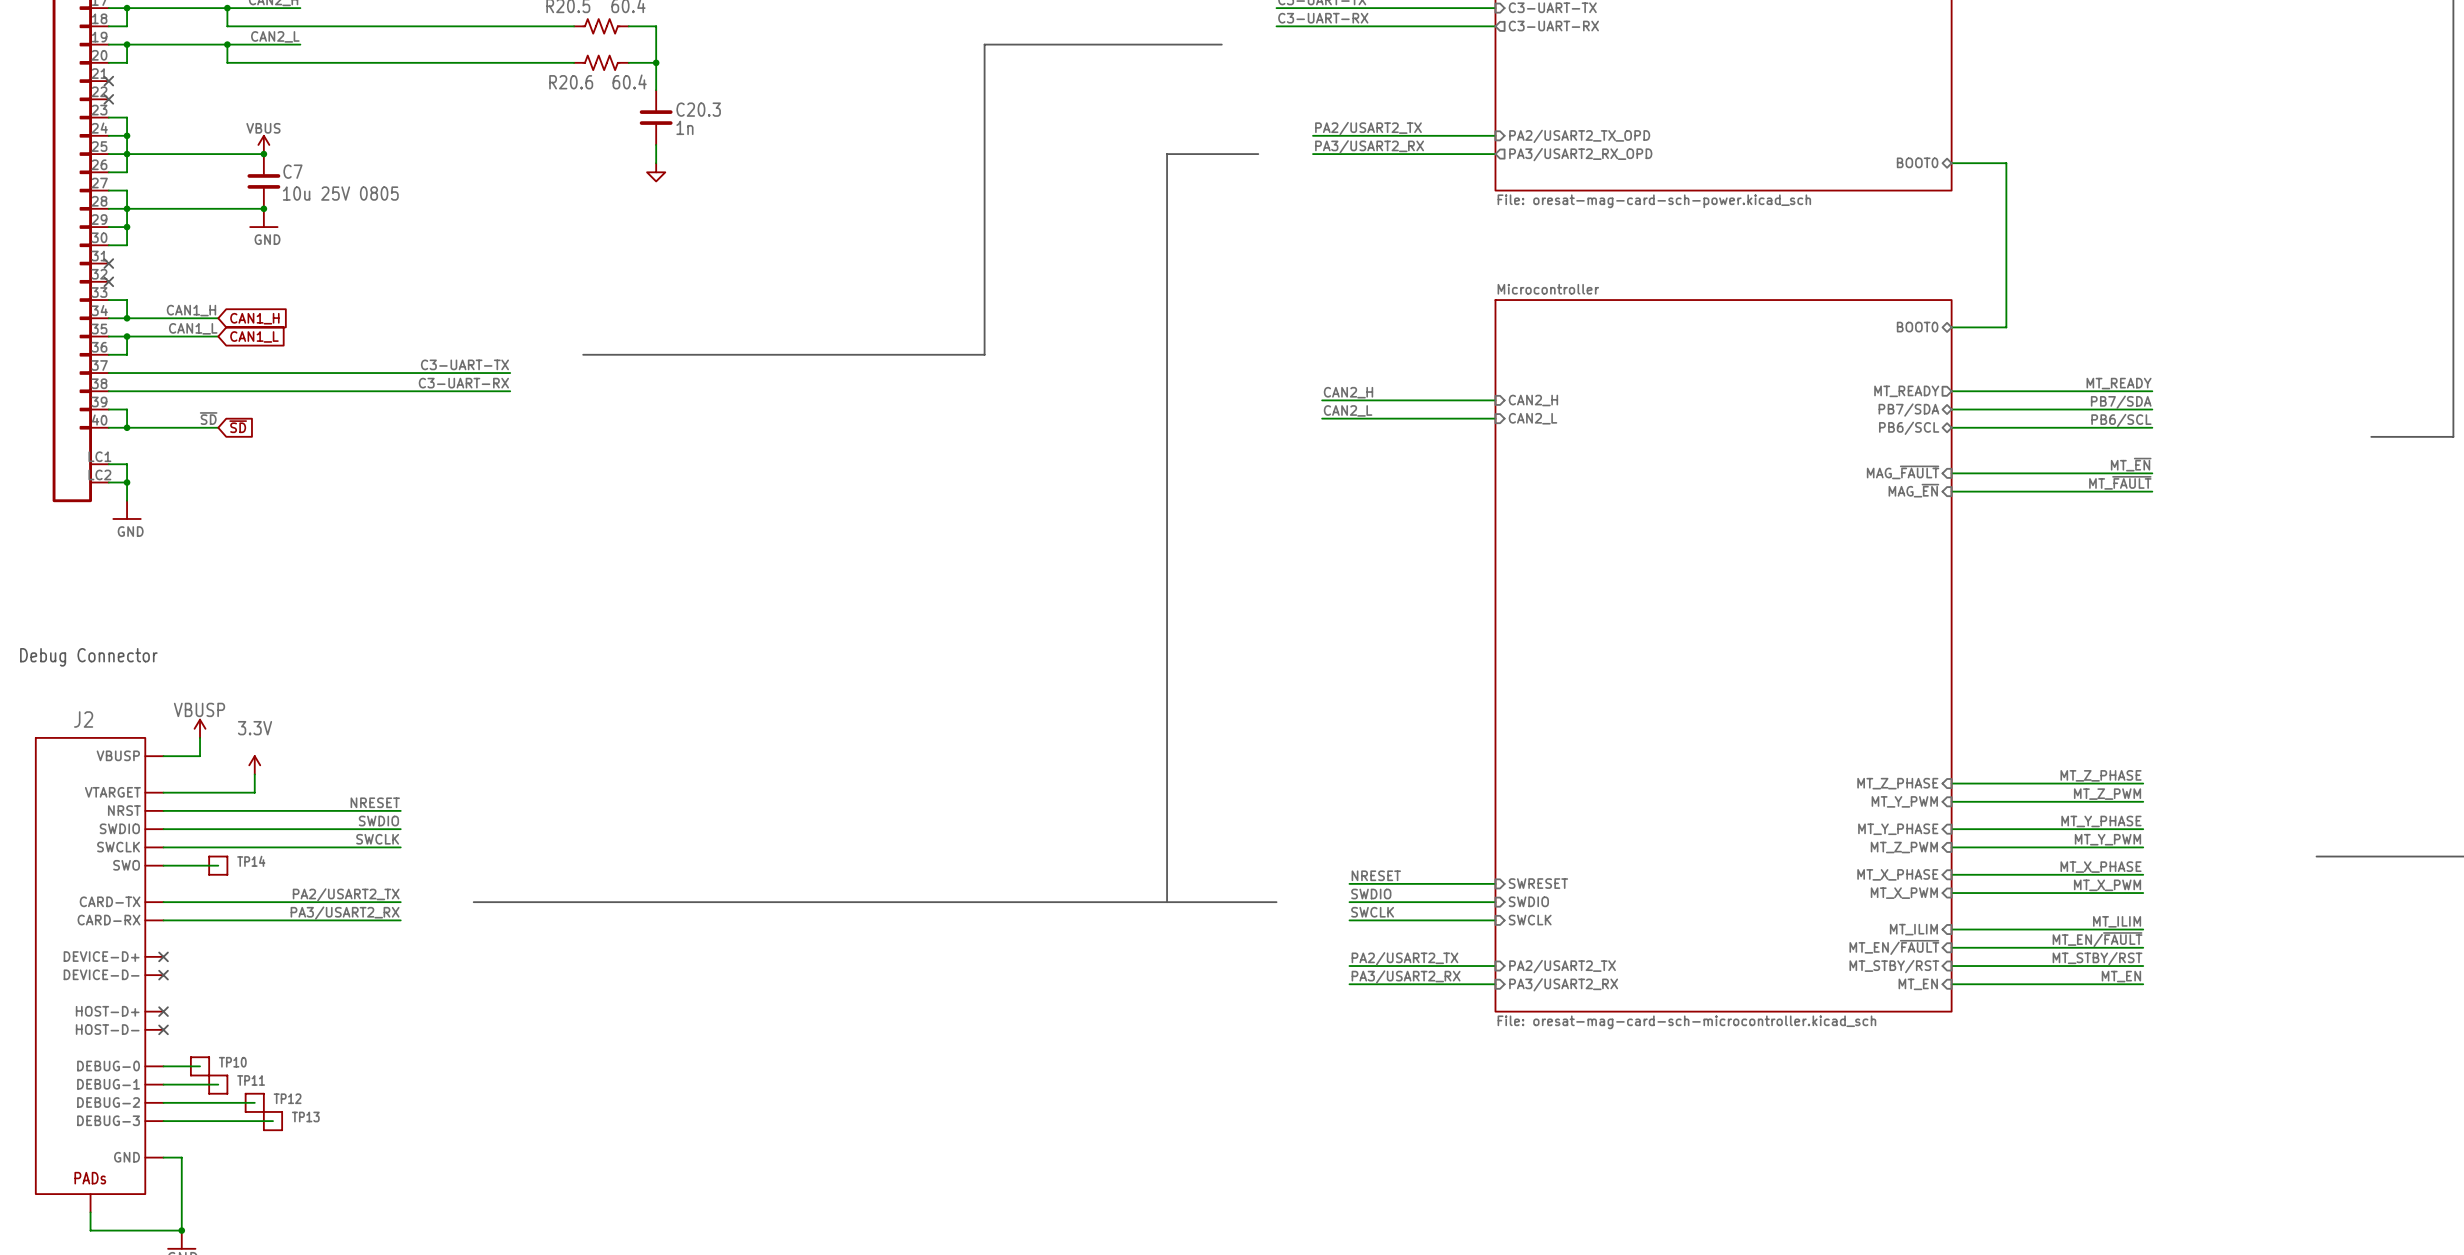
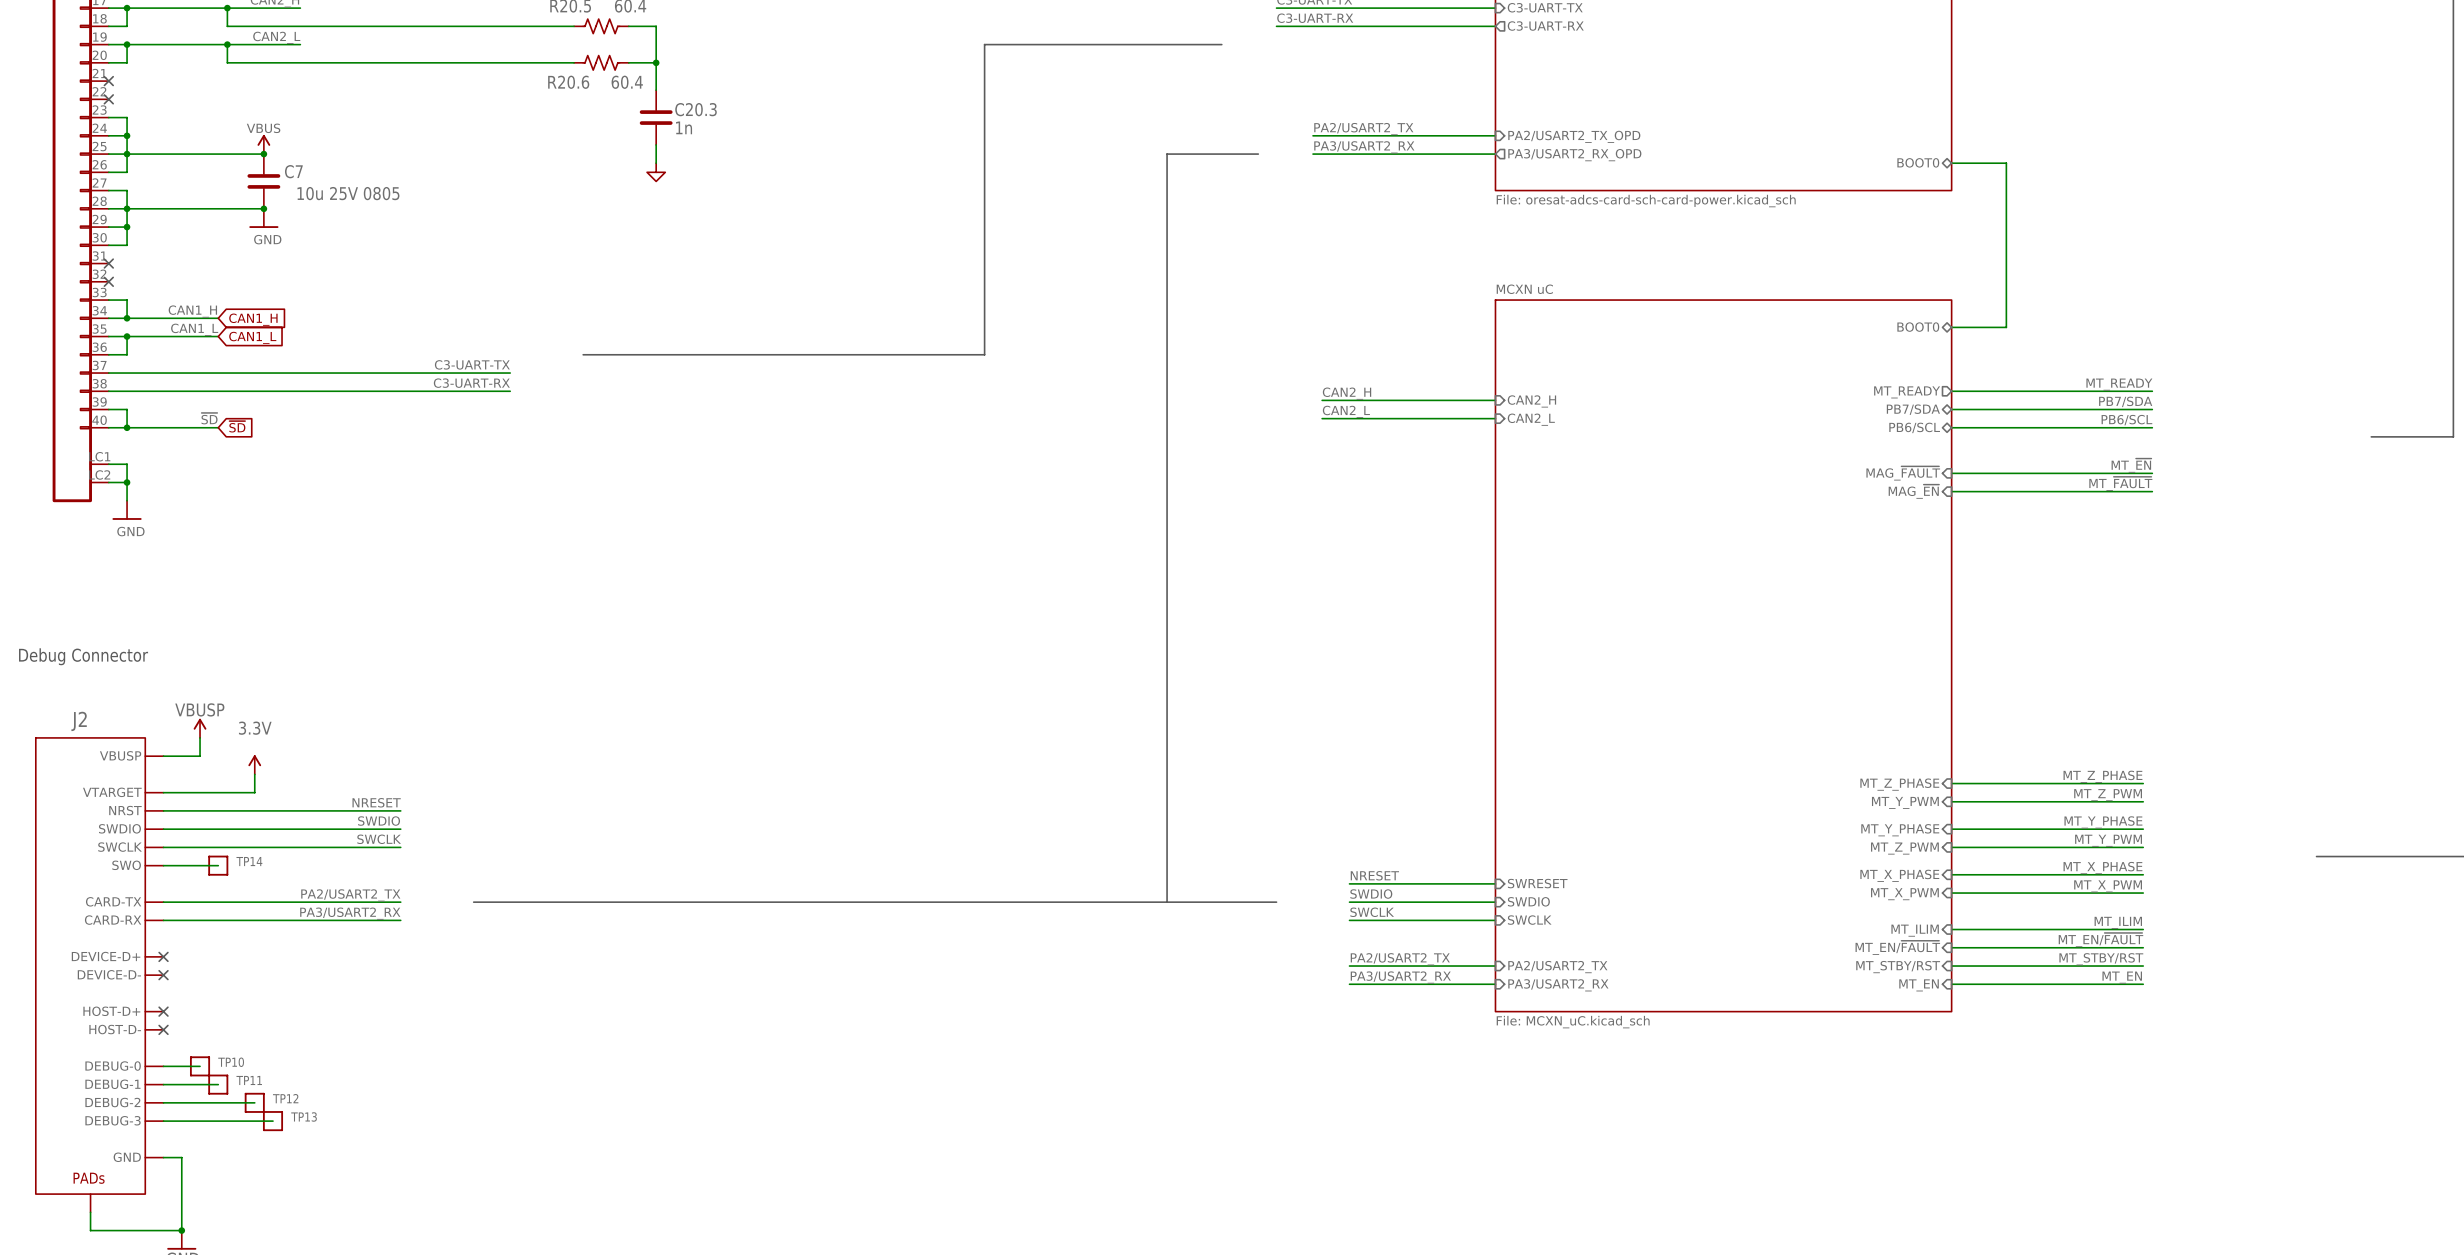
sheet value: File: oresat-mag-card-sch-power.kicad_sch (1654, 201) -> File: oresat-adcs-card-sch-card-power.kicad_sch (1646, 201)
sheet Microcontroller name: Microcontroller (1548, 289) -> MCXN uC (1524, 289)
sheet Microcontroller value: File: oresat-mag-card-sch-microcontroller.kicad_sch (1686, 1022) -> File: MCXN_uC.kicad_sch (1573, 1022)

